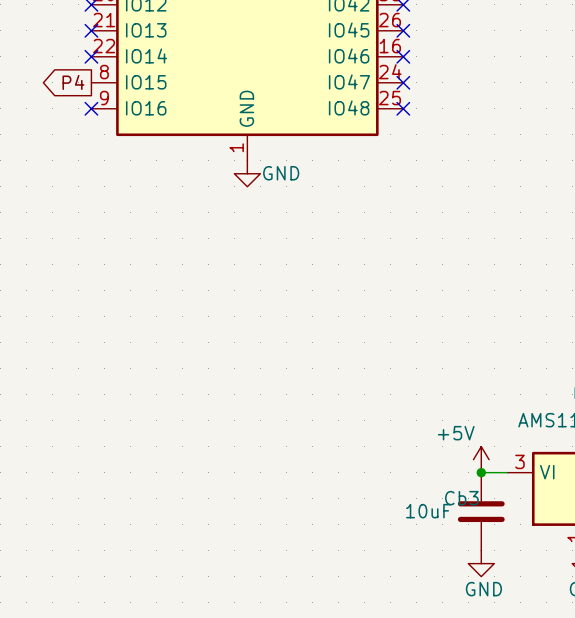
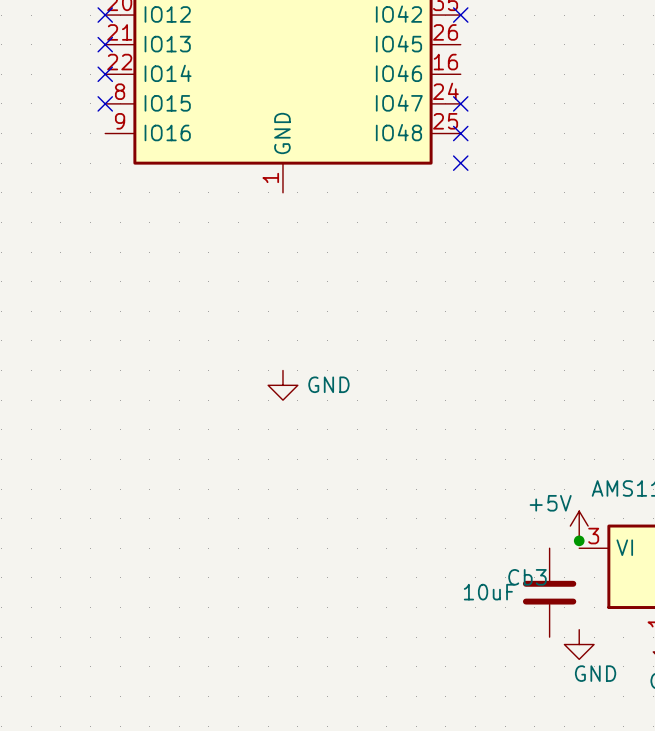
no-connect mark: (403, 30) -> none
no-connect mark: (403, 56) -> none
global label: P4 (73, 82) -> none
no-connect mark position: (91, 108) -> (105, 103)
no-connect mark: none -> (460, 163)
power symbol position: GND (247, 173) -> GND (282, 385)
power symbol text position: GND (281, 173) -> GND (328, 384)
power symbol text position: +5V (456, 433) -> +5V (550, 503)
power symbol position: +5V (481, 459) -> +5V (579, 526)
wire: (481, 472) (507, 472) -> none
junction position: (481, 472) -> (579, 540)
power symbol position: GND (481, 563) -> GND (579, 644)
power symbol text position: GND (483, 589) -> GND (595, 673)

